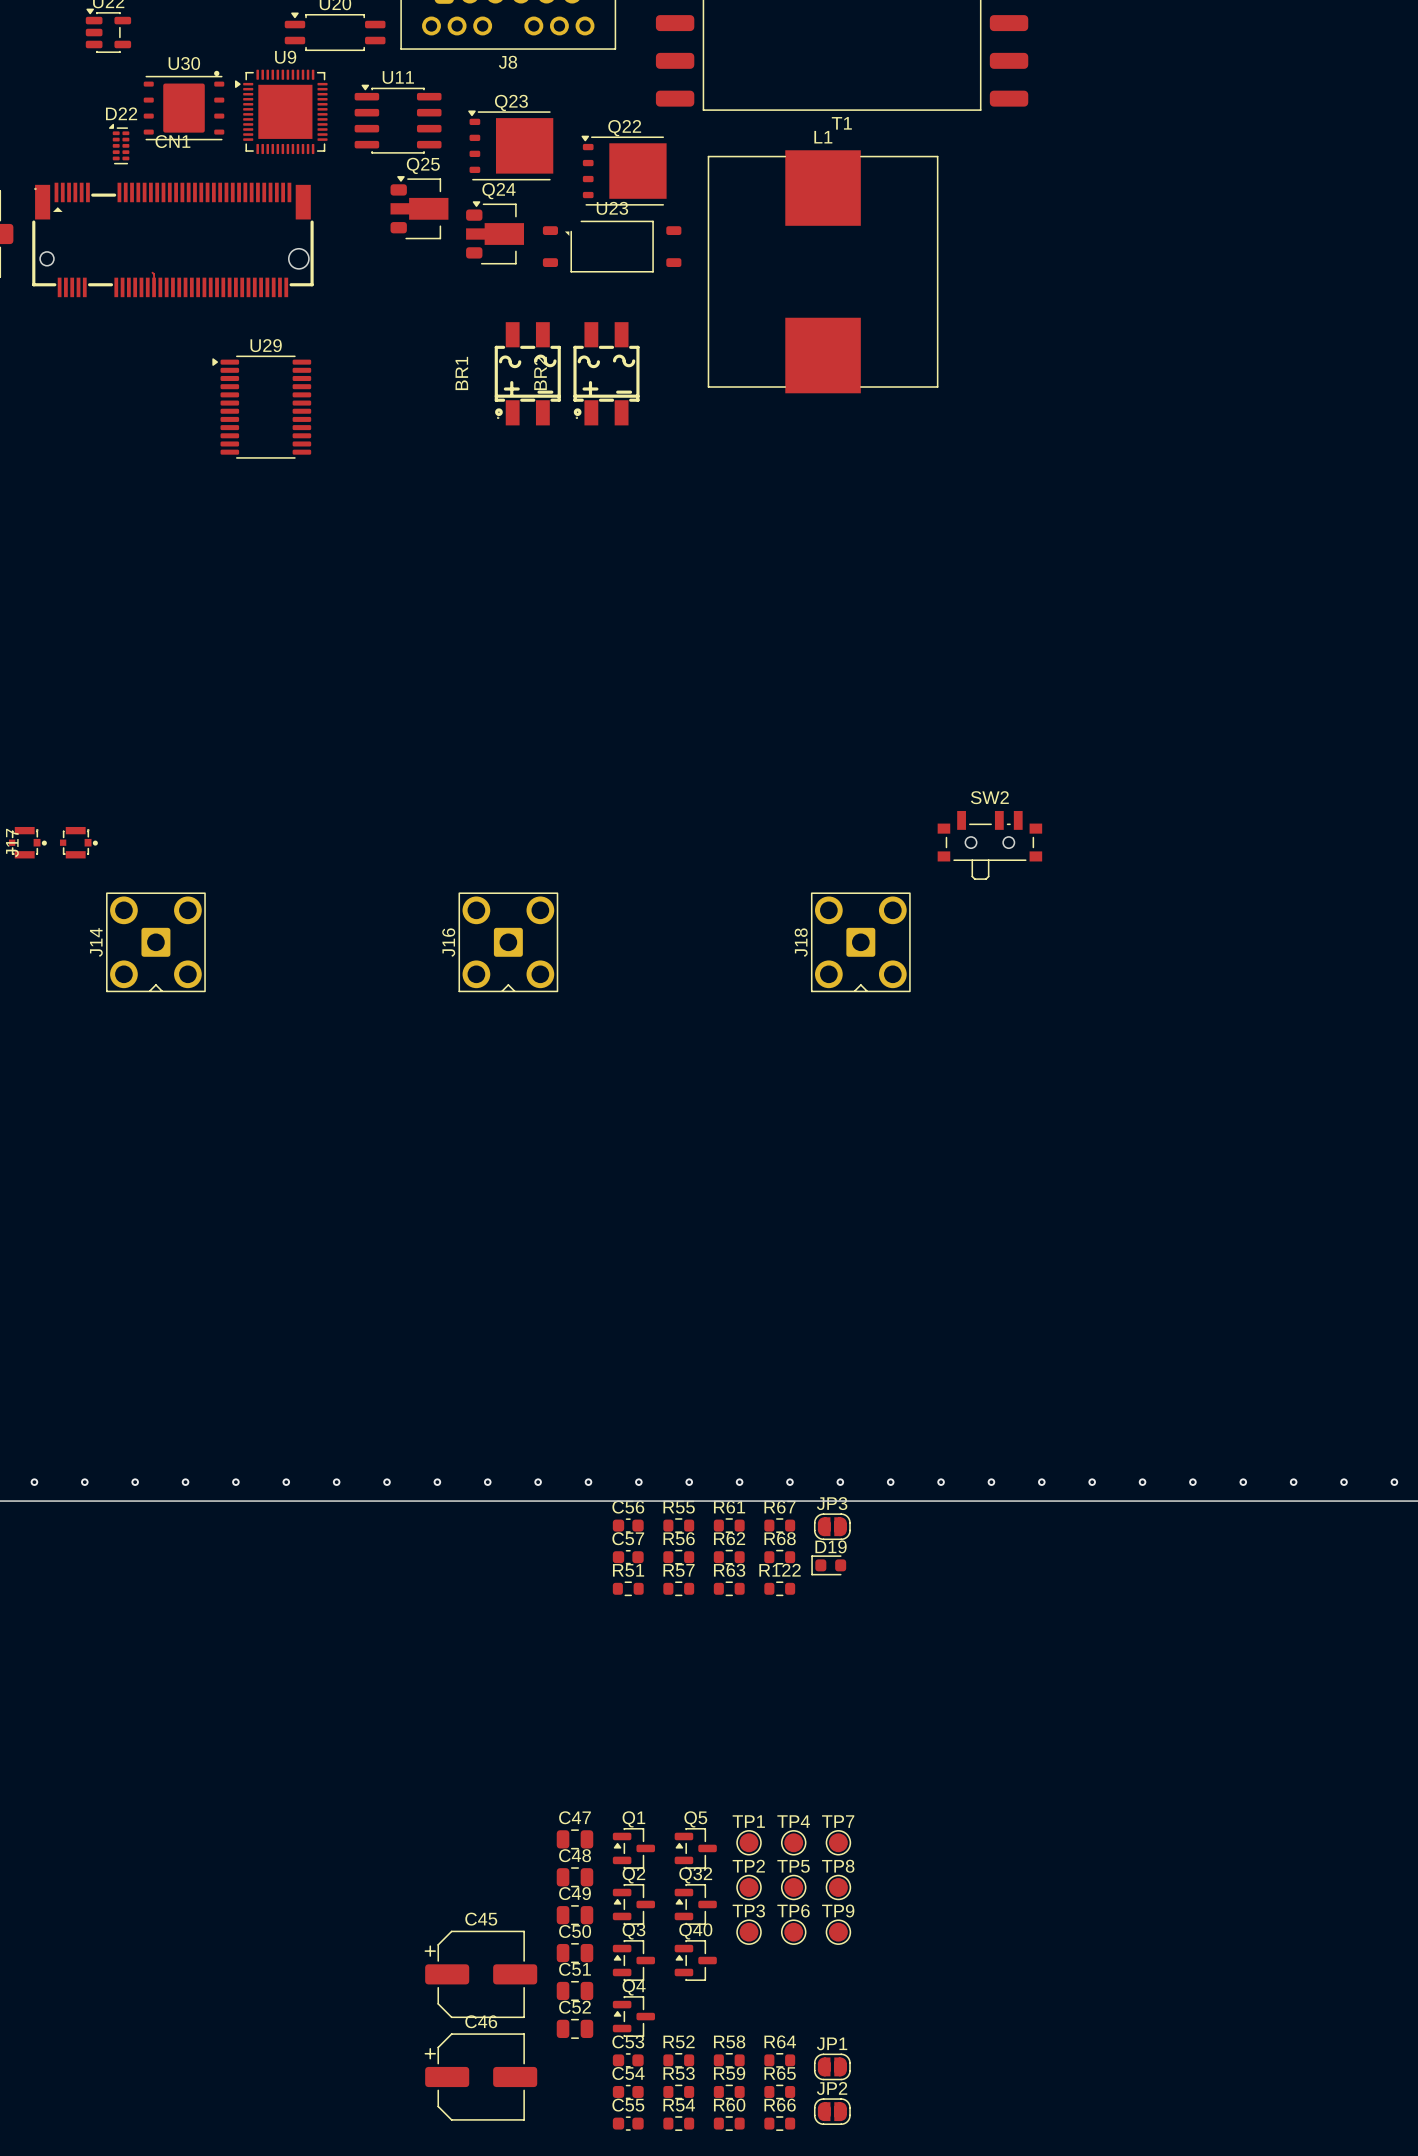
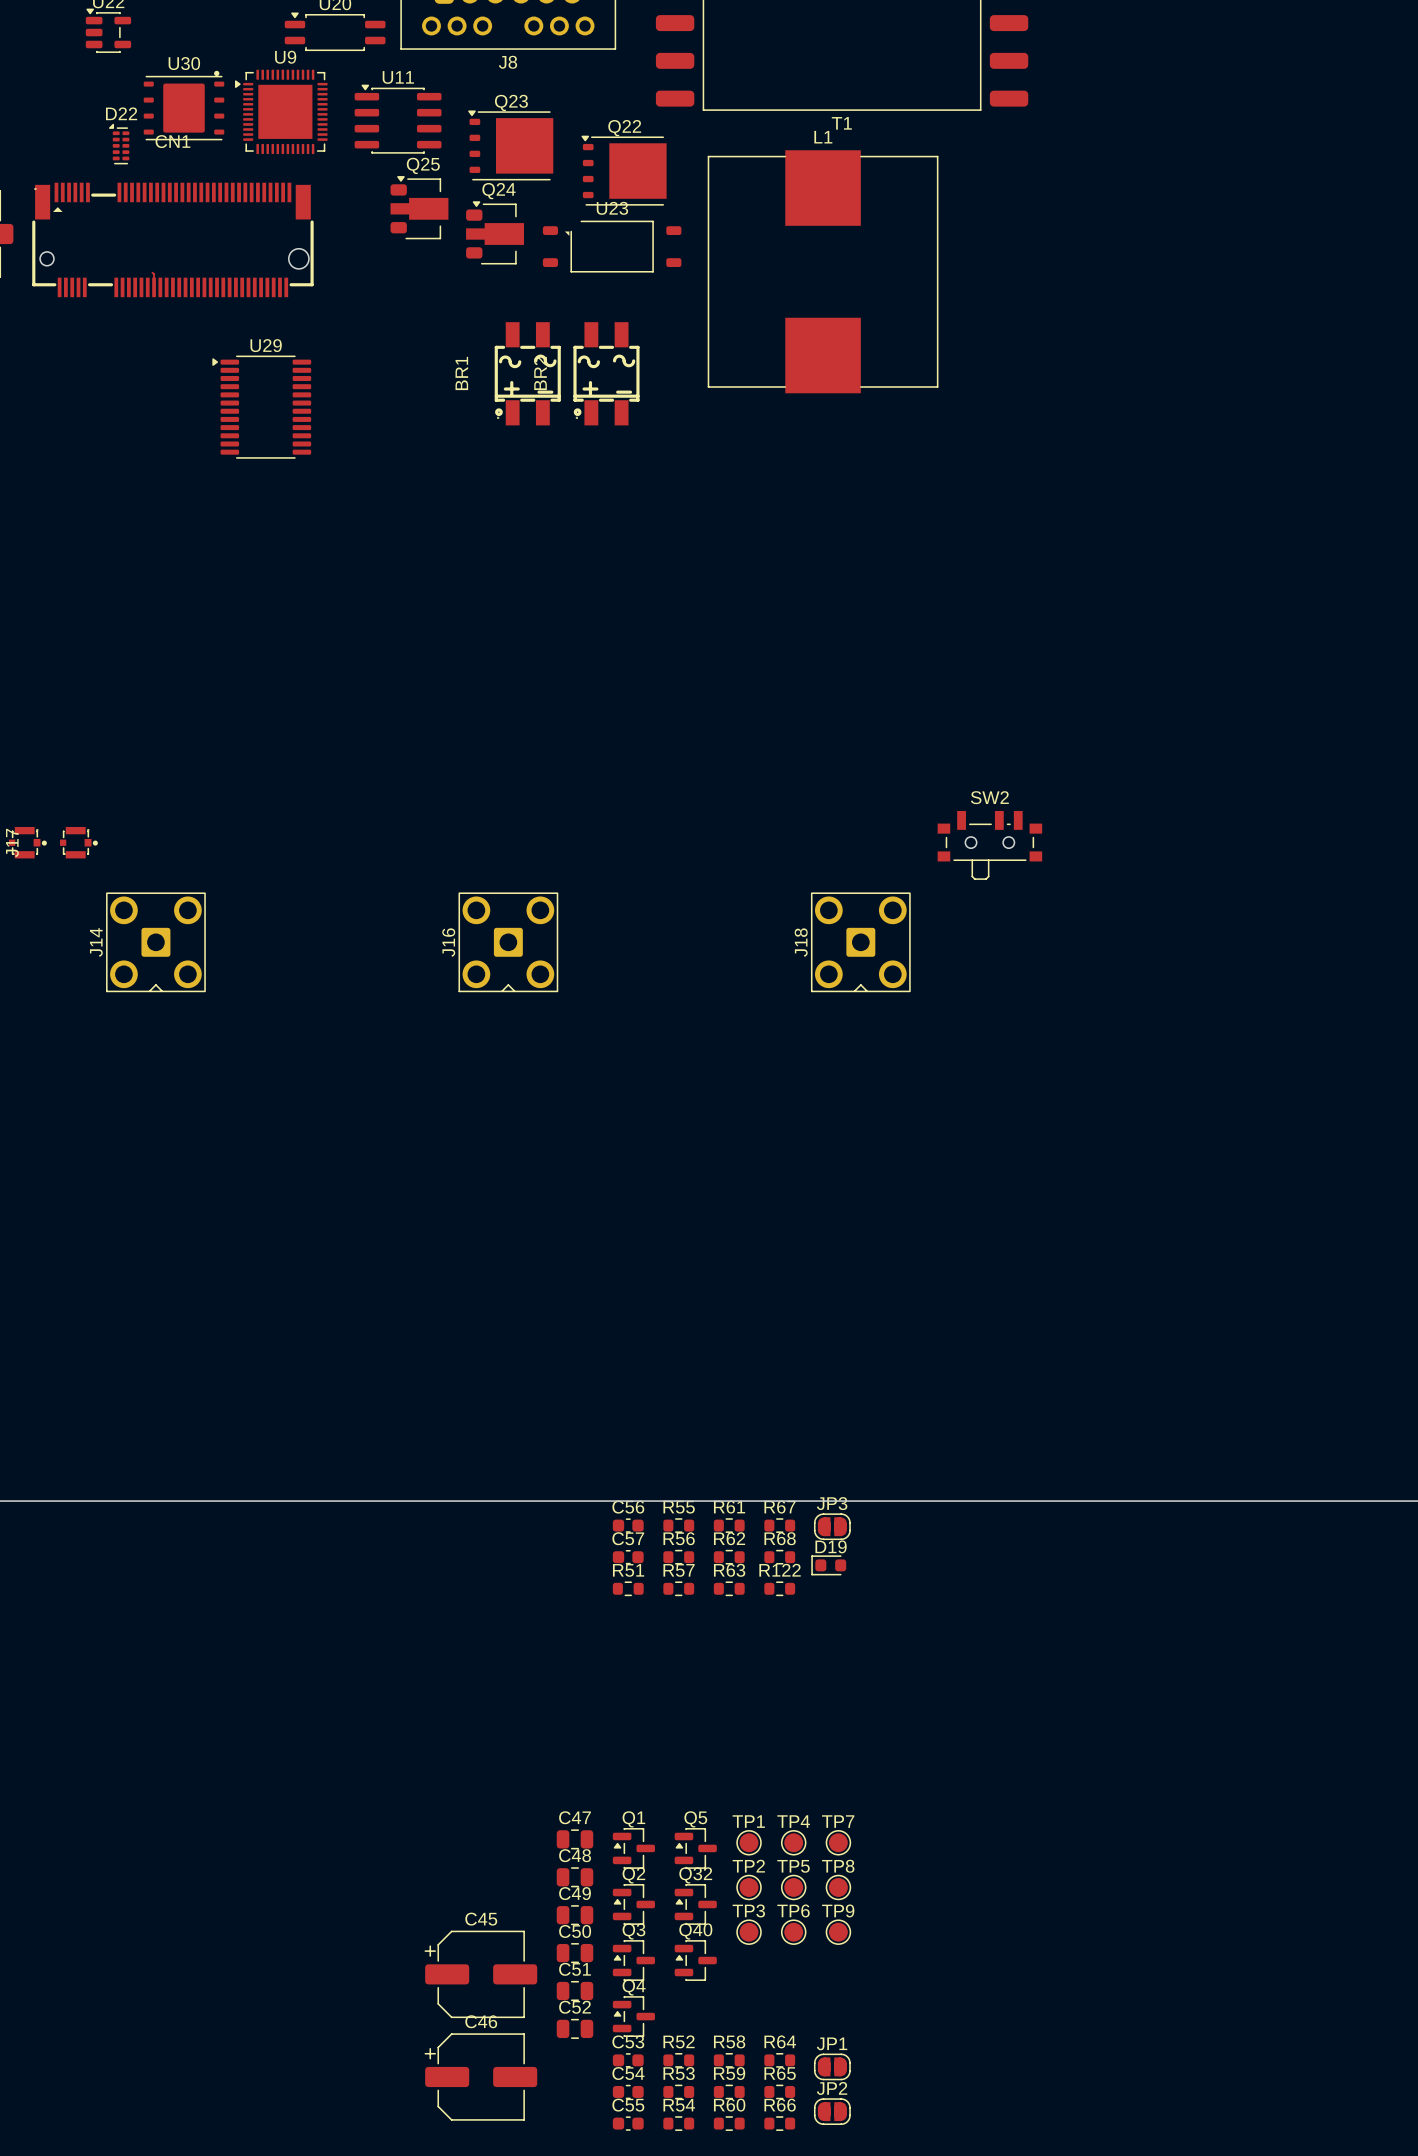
via: (34, 1482) -> none
via: (84, 1482) -> none
via: (135, 1482) -> none
via: (185, 1482) -> none
via: (235, 1482) -> none
via: (286, 1482) -> none
via: (336, 1482) -> none
via: (387, 1482) -> none
via: (437, 1482) -> none
via: (487, 1482) -> none
via: (538, 1482) -> none
via: (588, 1482) -> none
via: (638, 1482) -> none
via: (689, 1482) -> none
via: (739, 1482) -> none
via: (789, 1482) -> none
via: (840, 1482) -> none
via: (890, 1482) -> none
via: (941, 1482) -> none
via: (991, 1482) -> none
via: (1041, 1482) -> none
via: (1092, 1482) -> none
via: (1142, 1482) -> none
via: (1192, 1482) -> none
via: (1243, 1482) -> none
via: (1293, 1482) -> none
via: (1344, 1482) -> none
via: (1394, 1482) -> none

